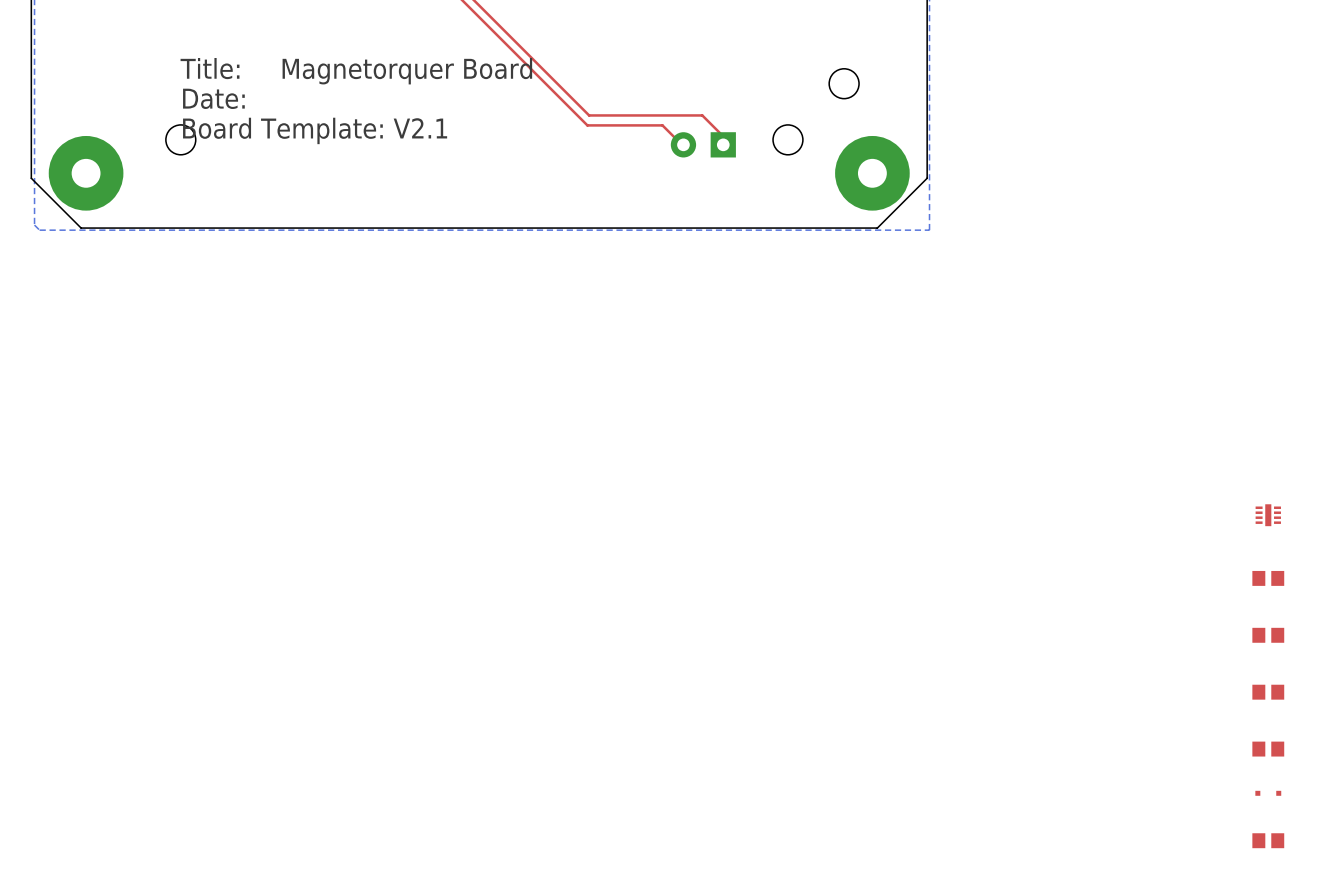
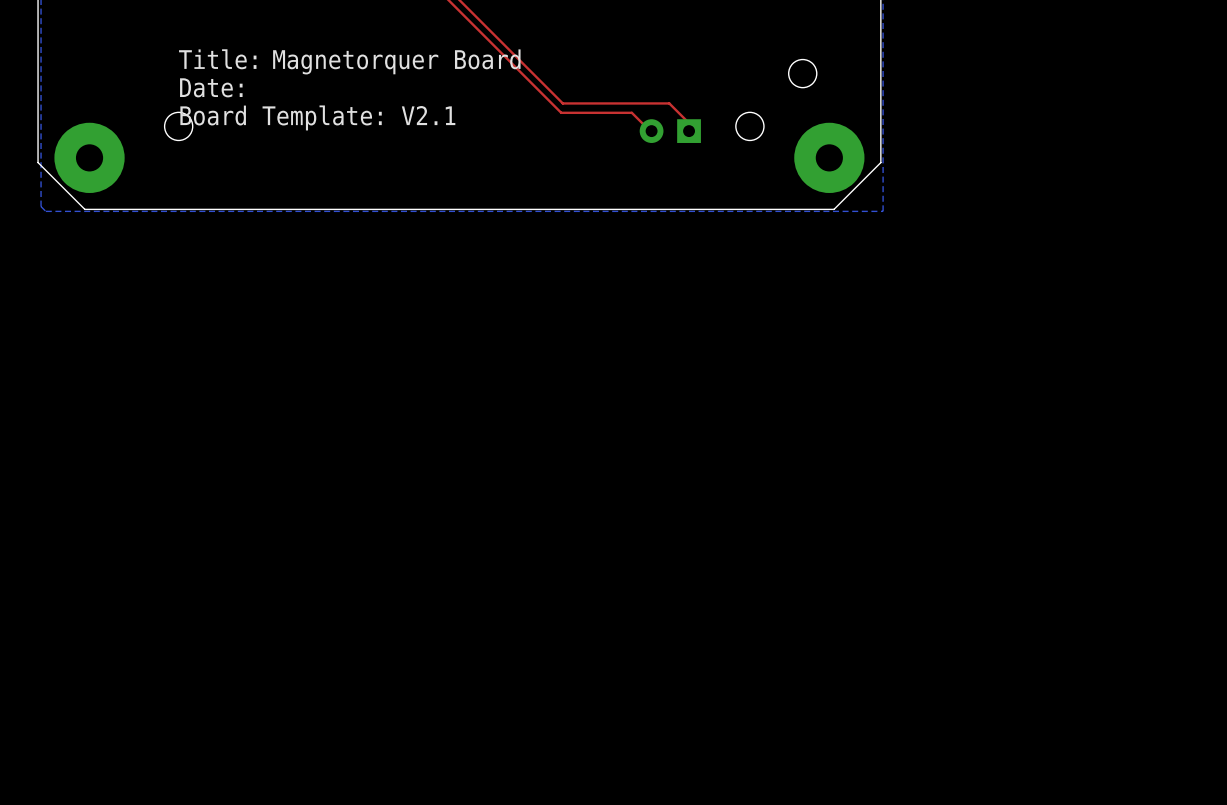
part: (1268, 515) -> none
part: (1268, 578) -> none
part: (1268, 635) -> none
part: (1268, 692) -> none
part: (1268, 749) -> none
part: (1268, 793) -> none
part: (1268, 840) -> none

